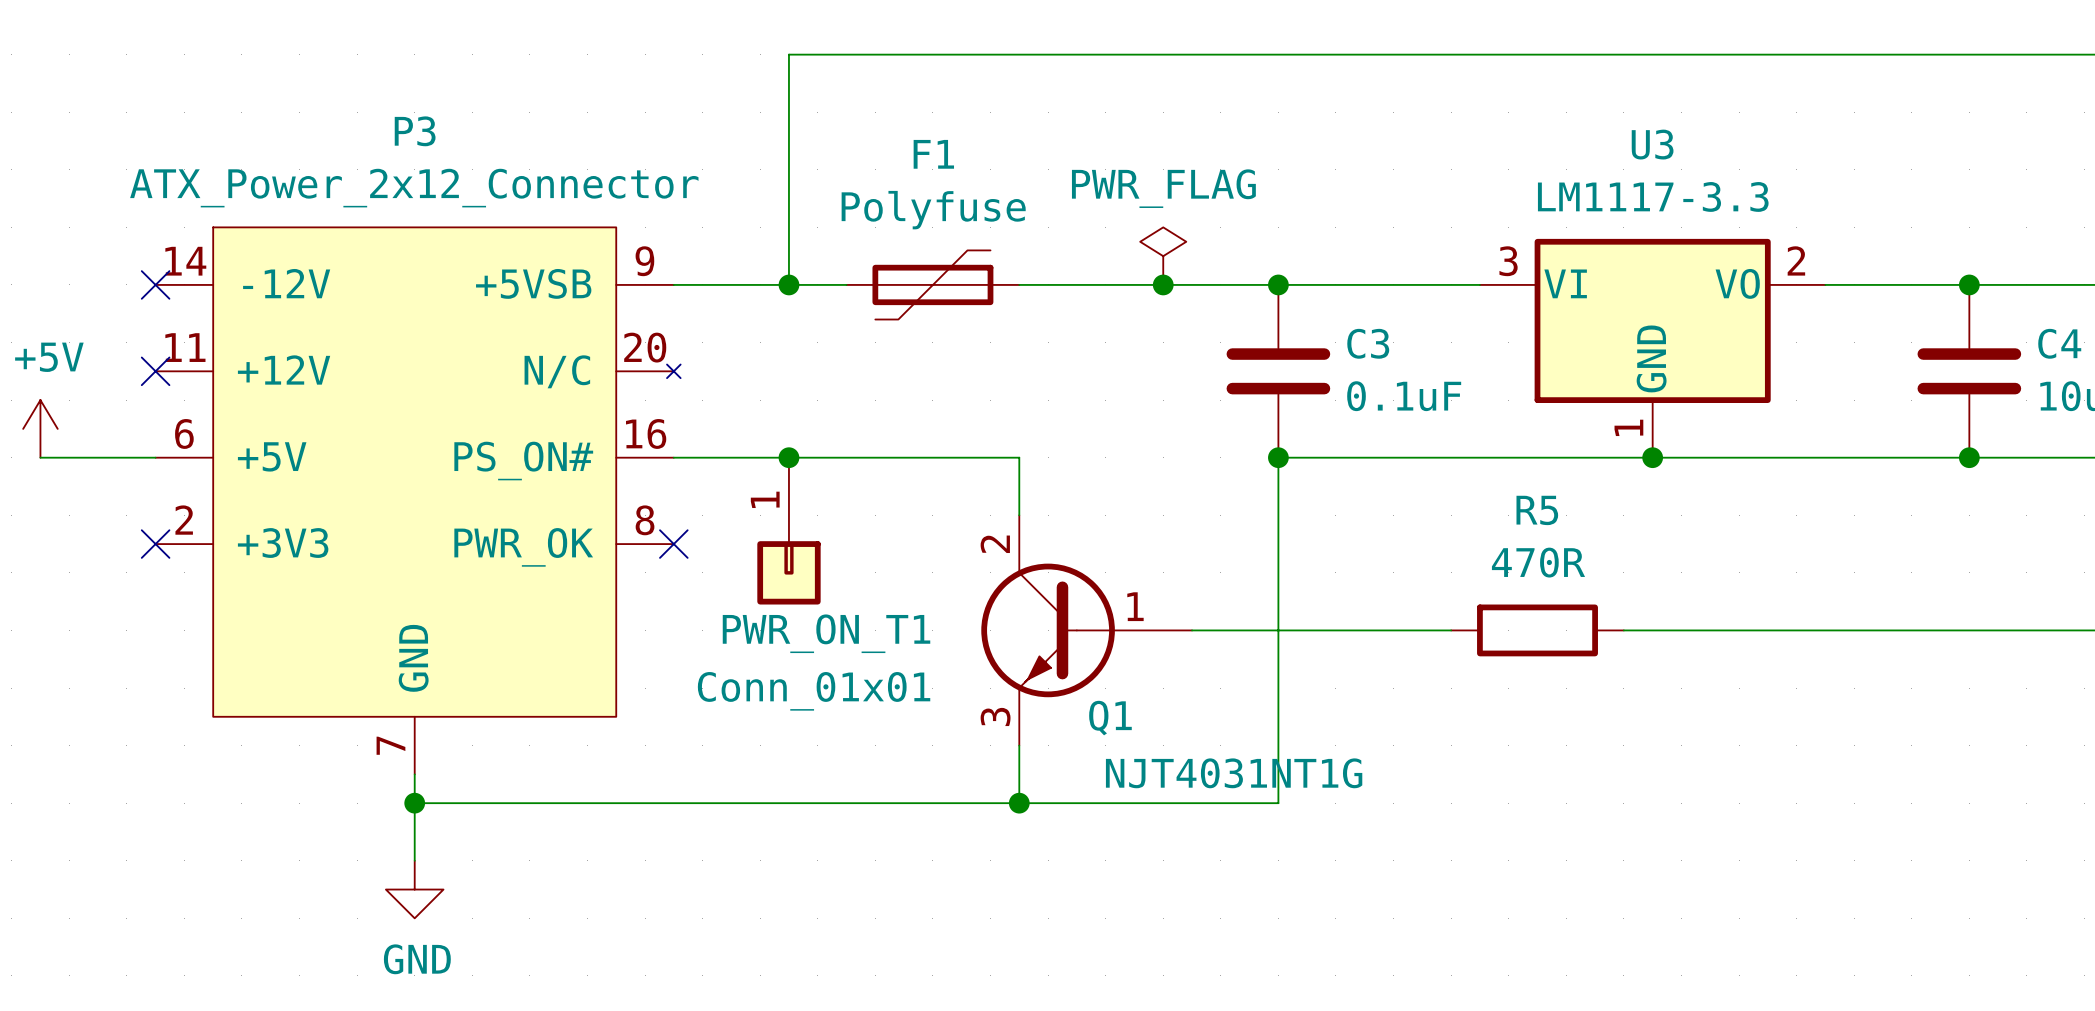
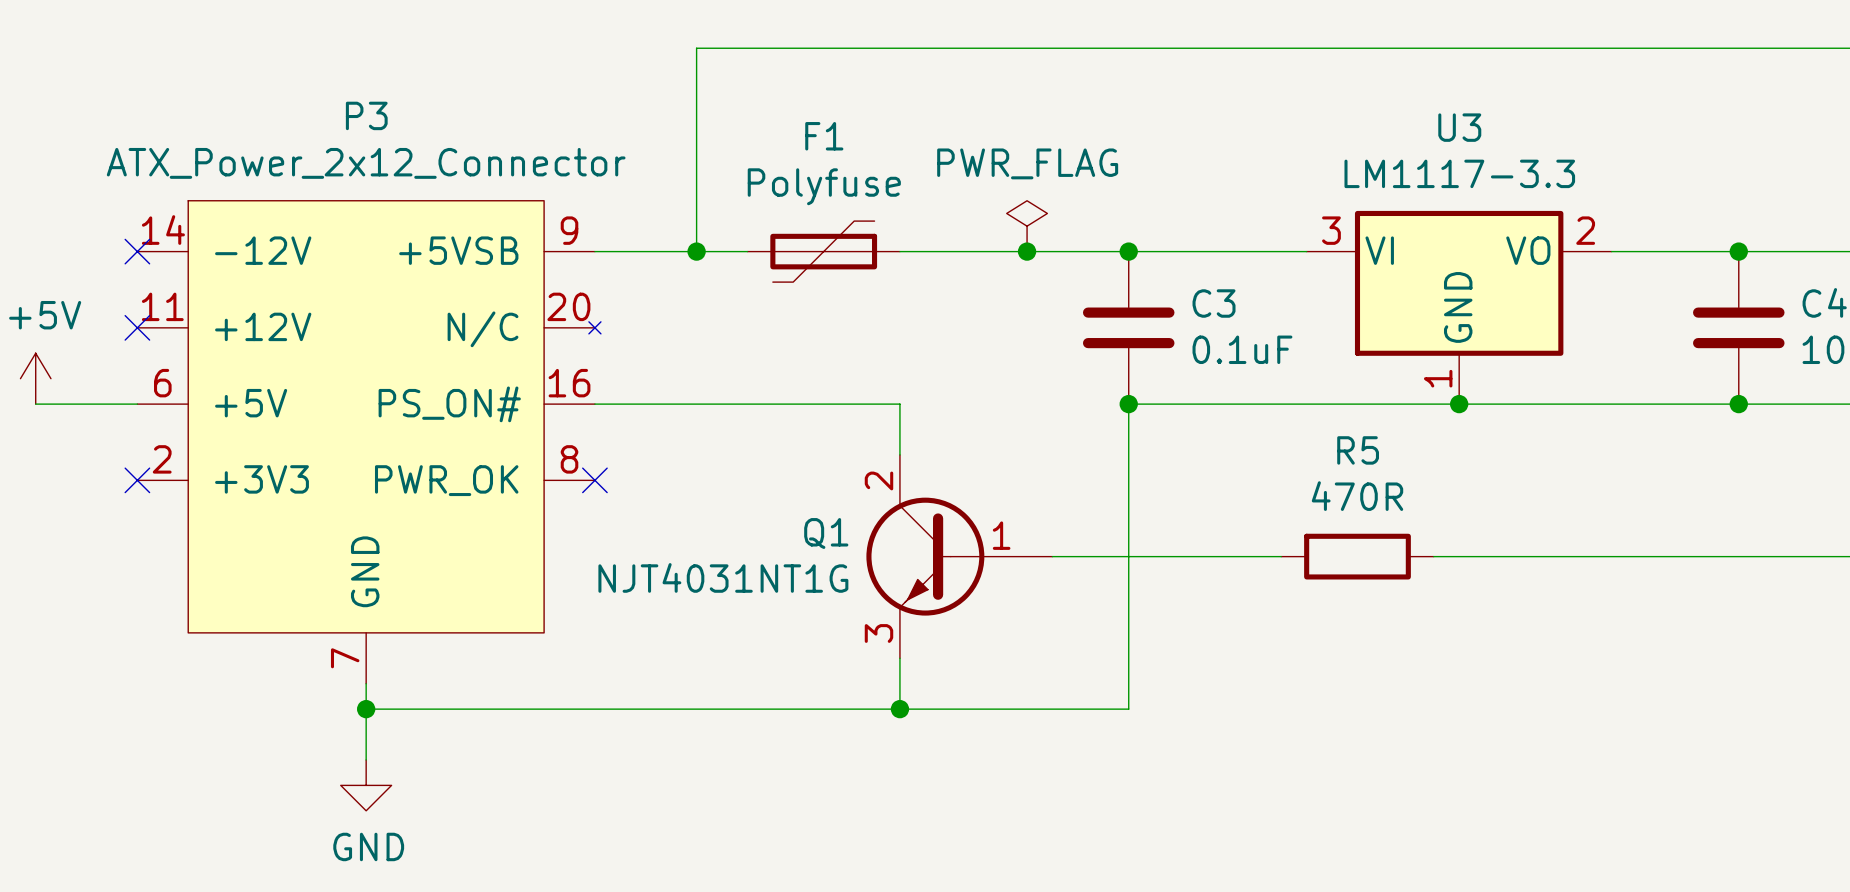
junction: (788, 457) -> none
PWR_ON_T1: Conn_01x01 (788, 531) -> none
Q1 name position: Q1 (1110, 718) -> Q1 (826, 533)
Q1 value position: NJT4031NT1G (1234, 773) -> NJT4031NT1G (723, 577)

